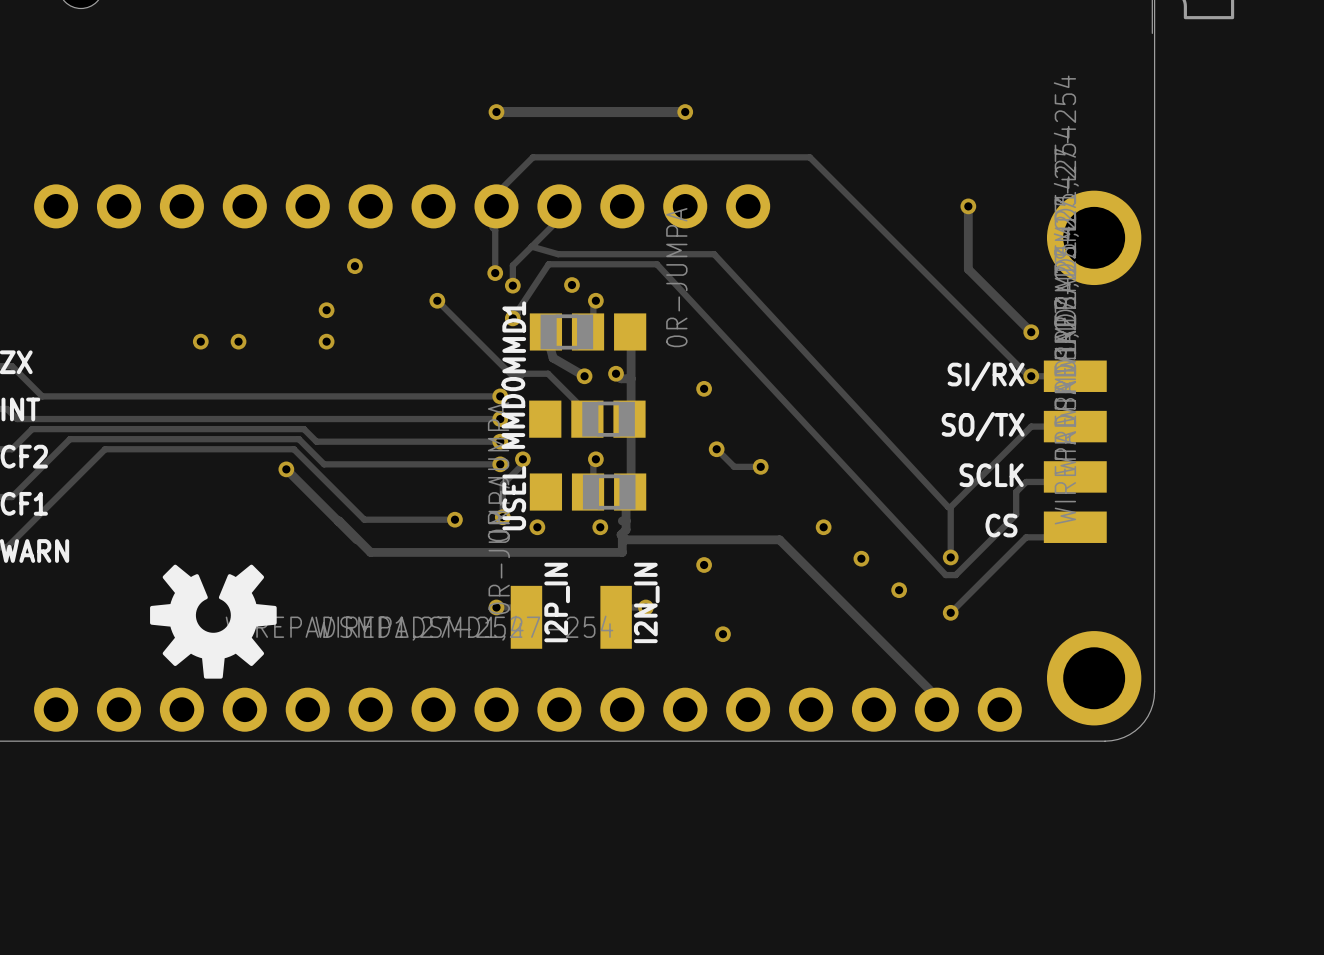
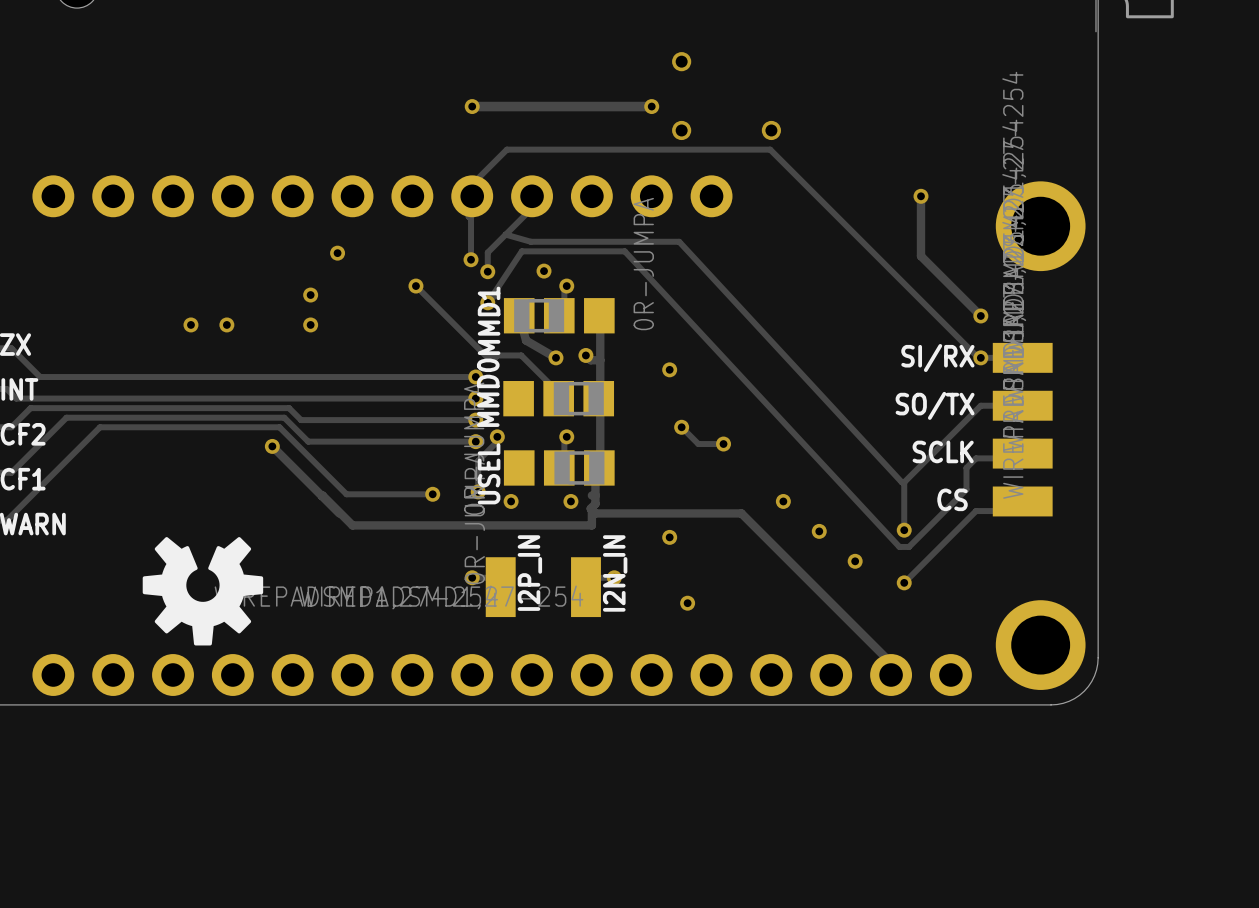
via: none -> (681, 61)
via: none -> (681, 130)
via: none -> (771, 130)

